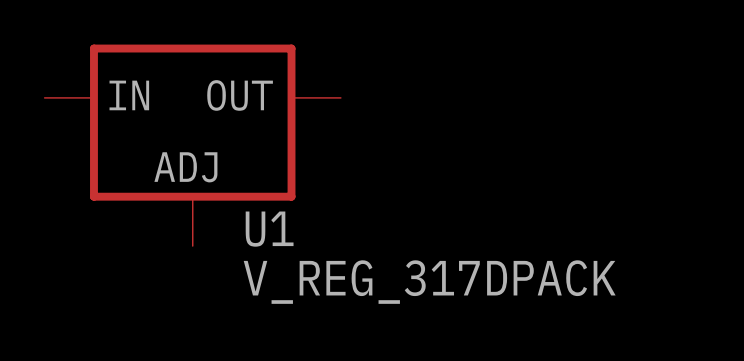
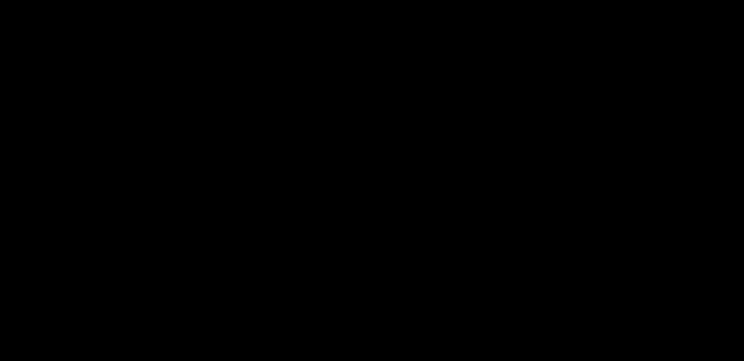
U1: V_REG_317DPACK (192, 145) -> none

